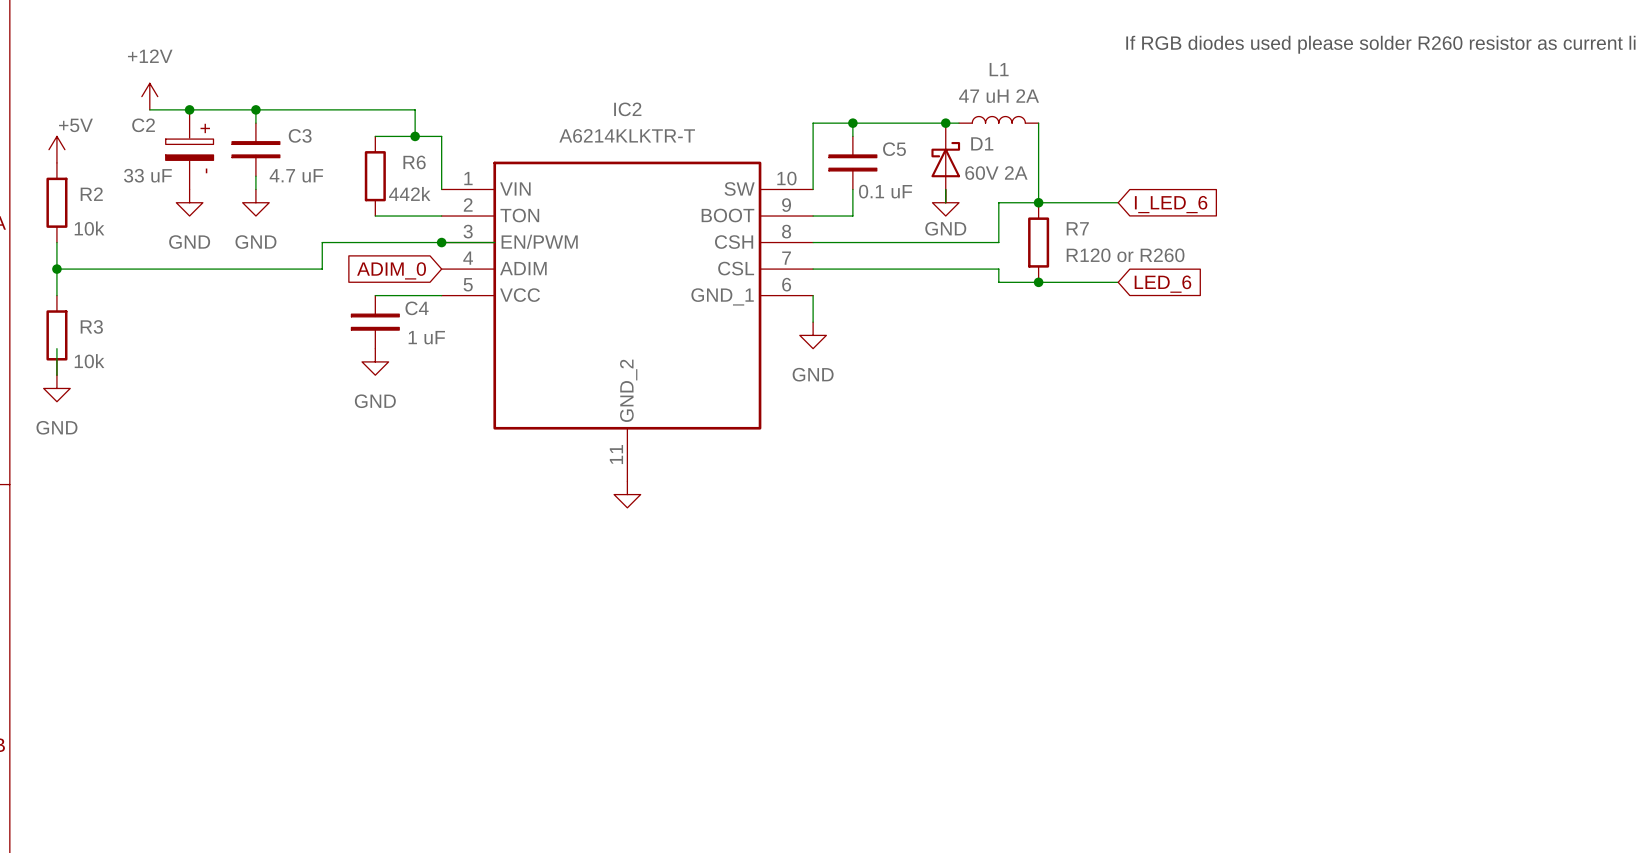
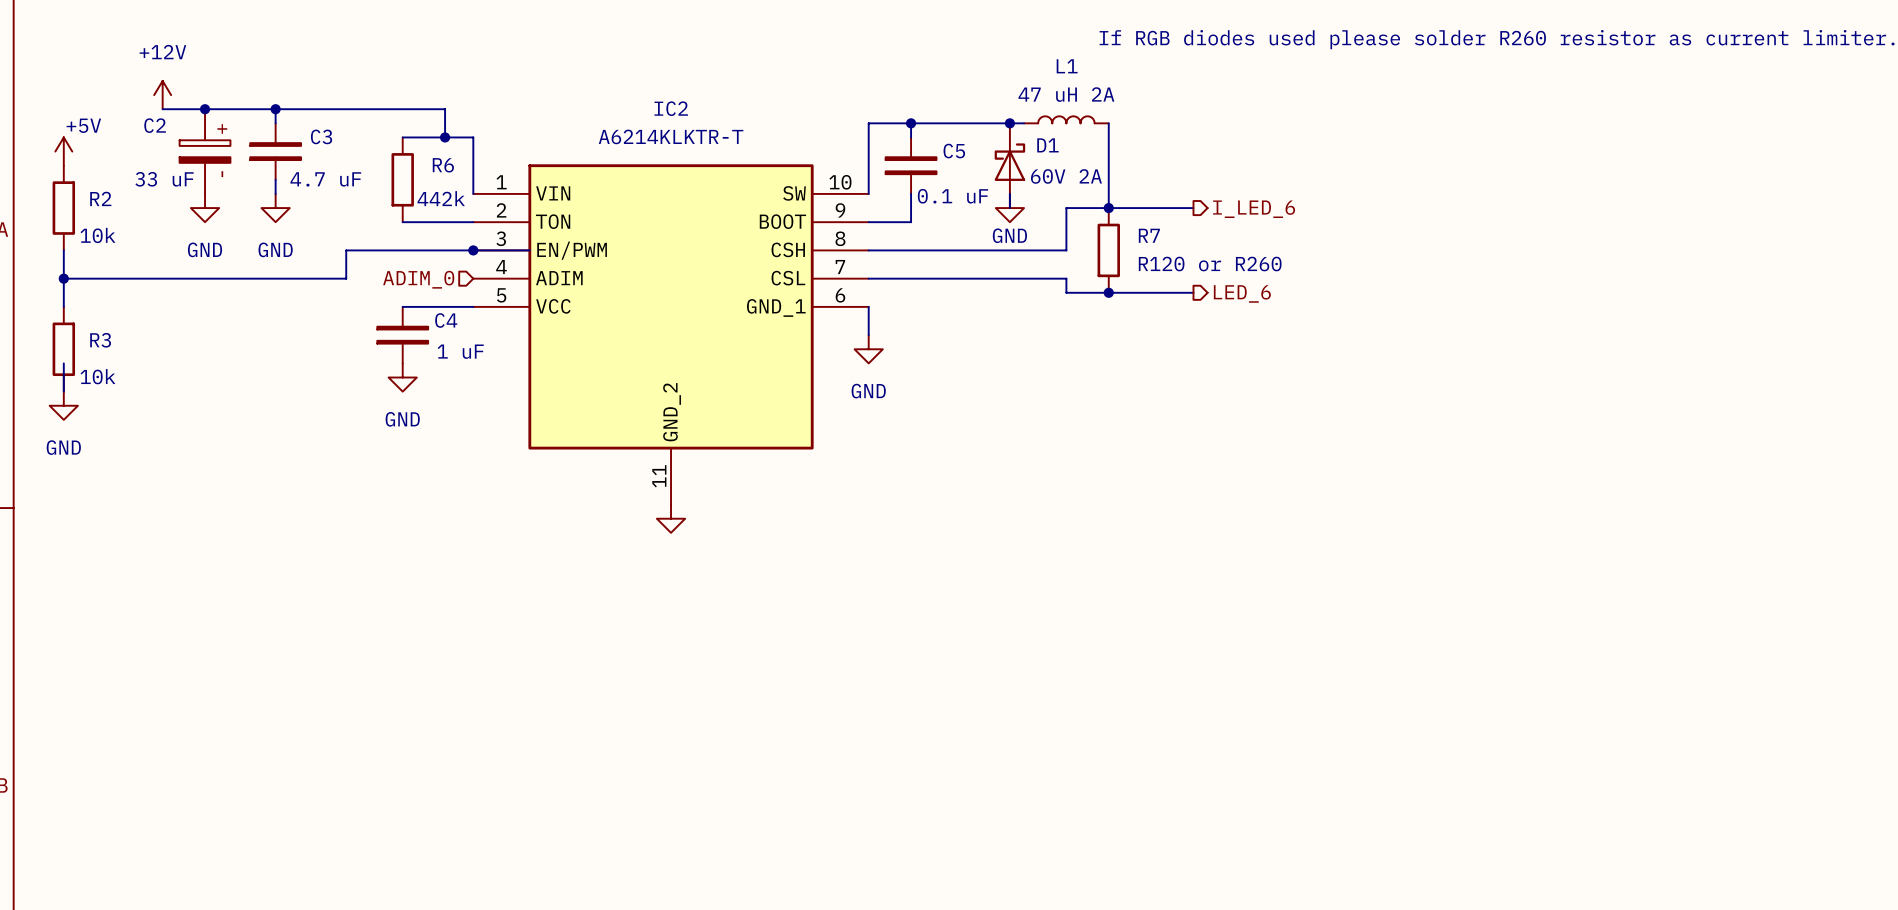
global label: I_LED_6 (1171, 204) -> none
hierarchical label: none -> I_LED_6 (1254, 209)
hierarchical label: none -> ADIM_0 (418, 279)
global label: ADIM_0 (391, 270) -> none
hierarchical label: none -> LED_6 (1242, 293)
global label: LED_6 (1162, 284) -> none

